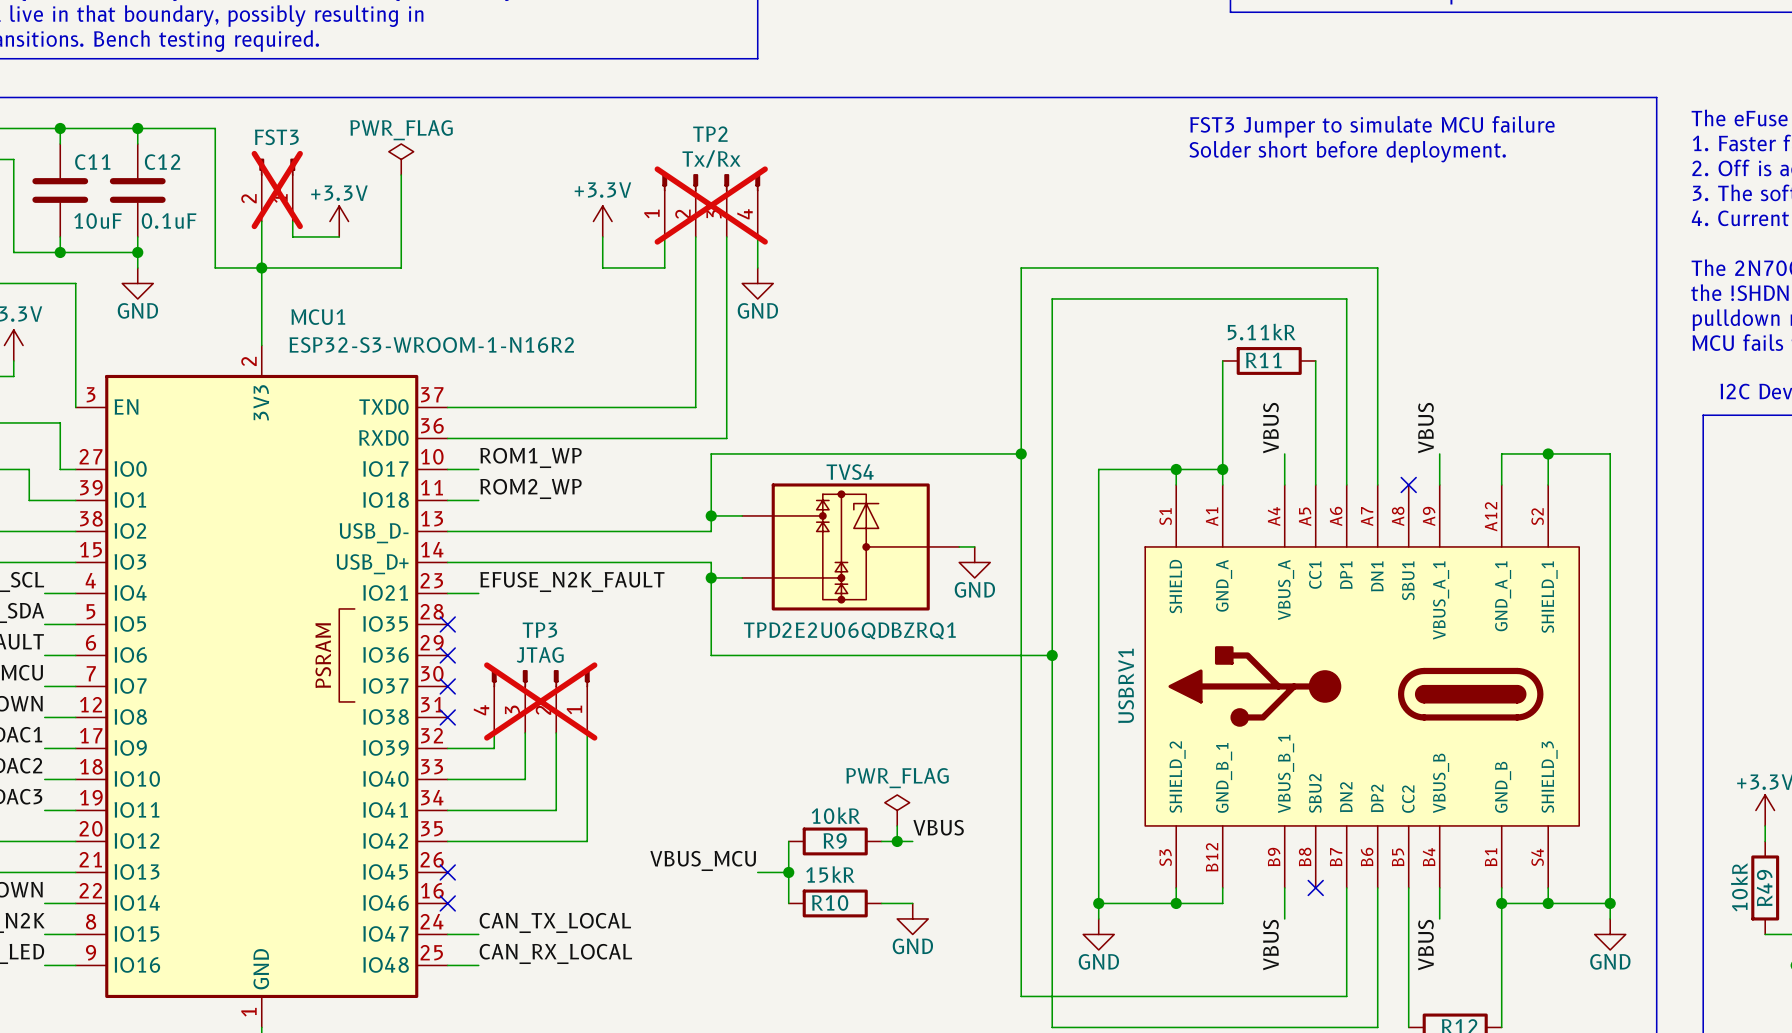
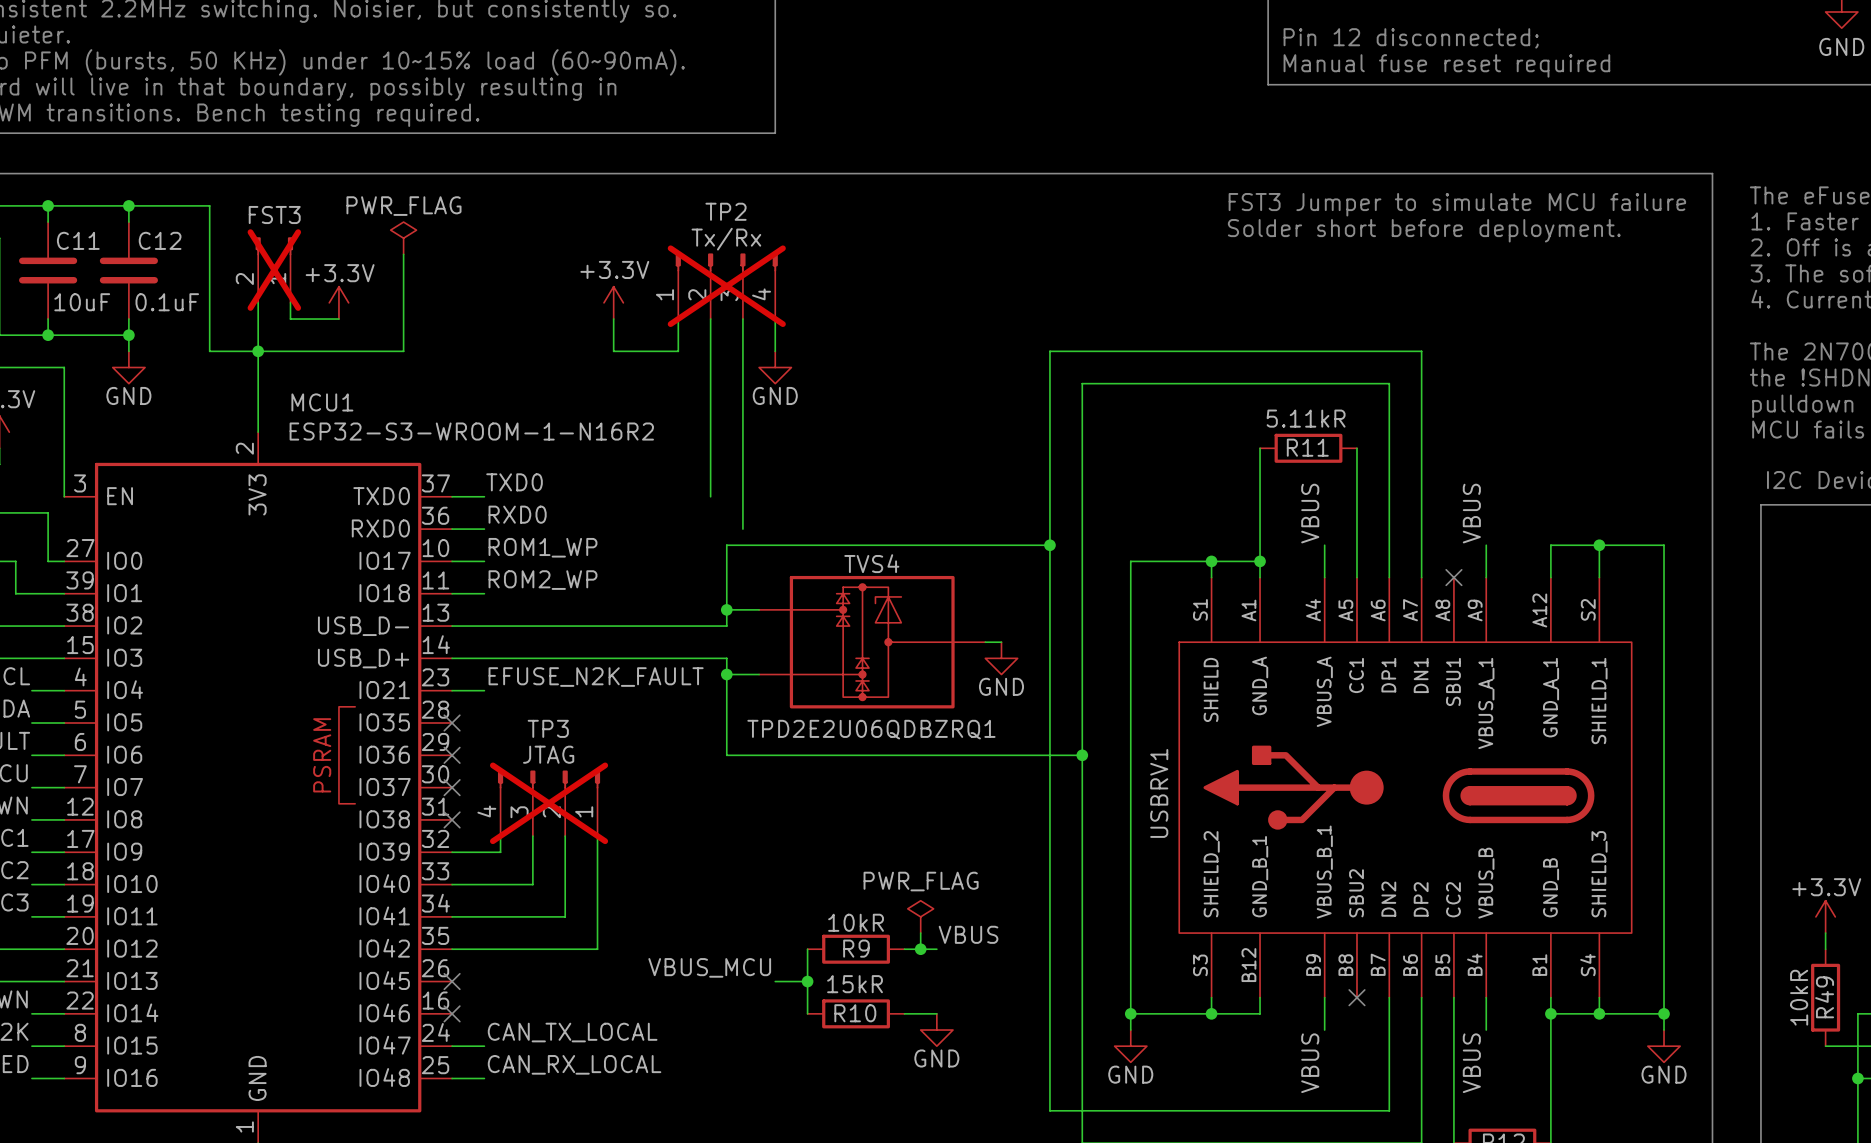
label: none -> TXD0 (514, 482)
wire: (478, 407) (695, 407) -> none
label: none -> RXD0 (517, 514)
wire: (478, 438) (726, 438) -> none

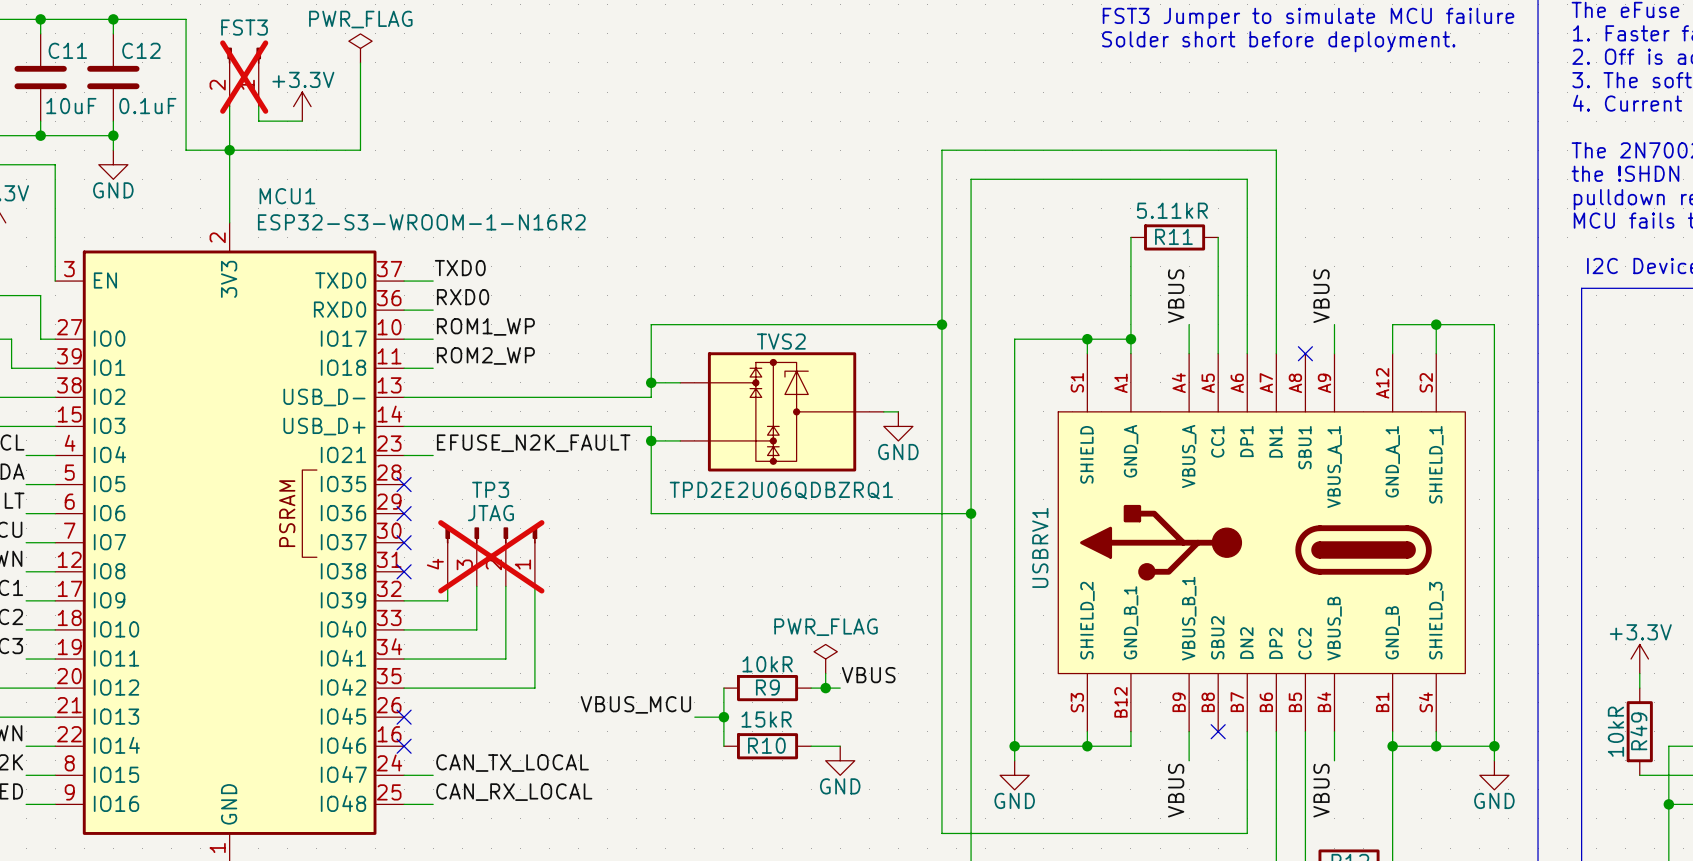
TP2: Tx/Rx (726, 286) -> none
power symbol: +3.3V (613, 302) -> none
wire: (613, 319) (613, 351) (678, 351) (678, 319) -> none
wire: (710, 319) (710, 496) -> none
wire: (742, 319) (742, 529) -> none
wire: (775, 319) (775, 351) -> none
power symbol: GND (775, 367) -> none
TVS4 name: TVS4 (871, 563) -> TVS2 (781, 341)

